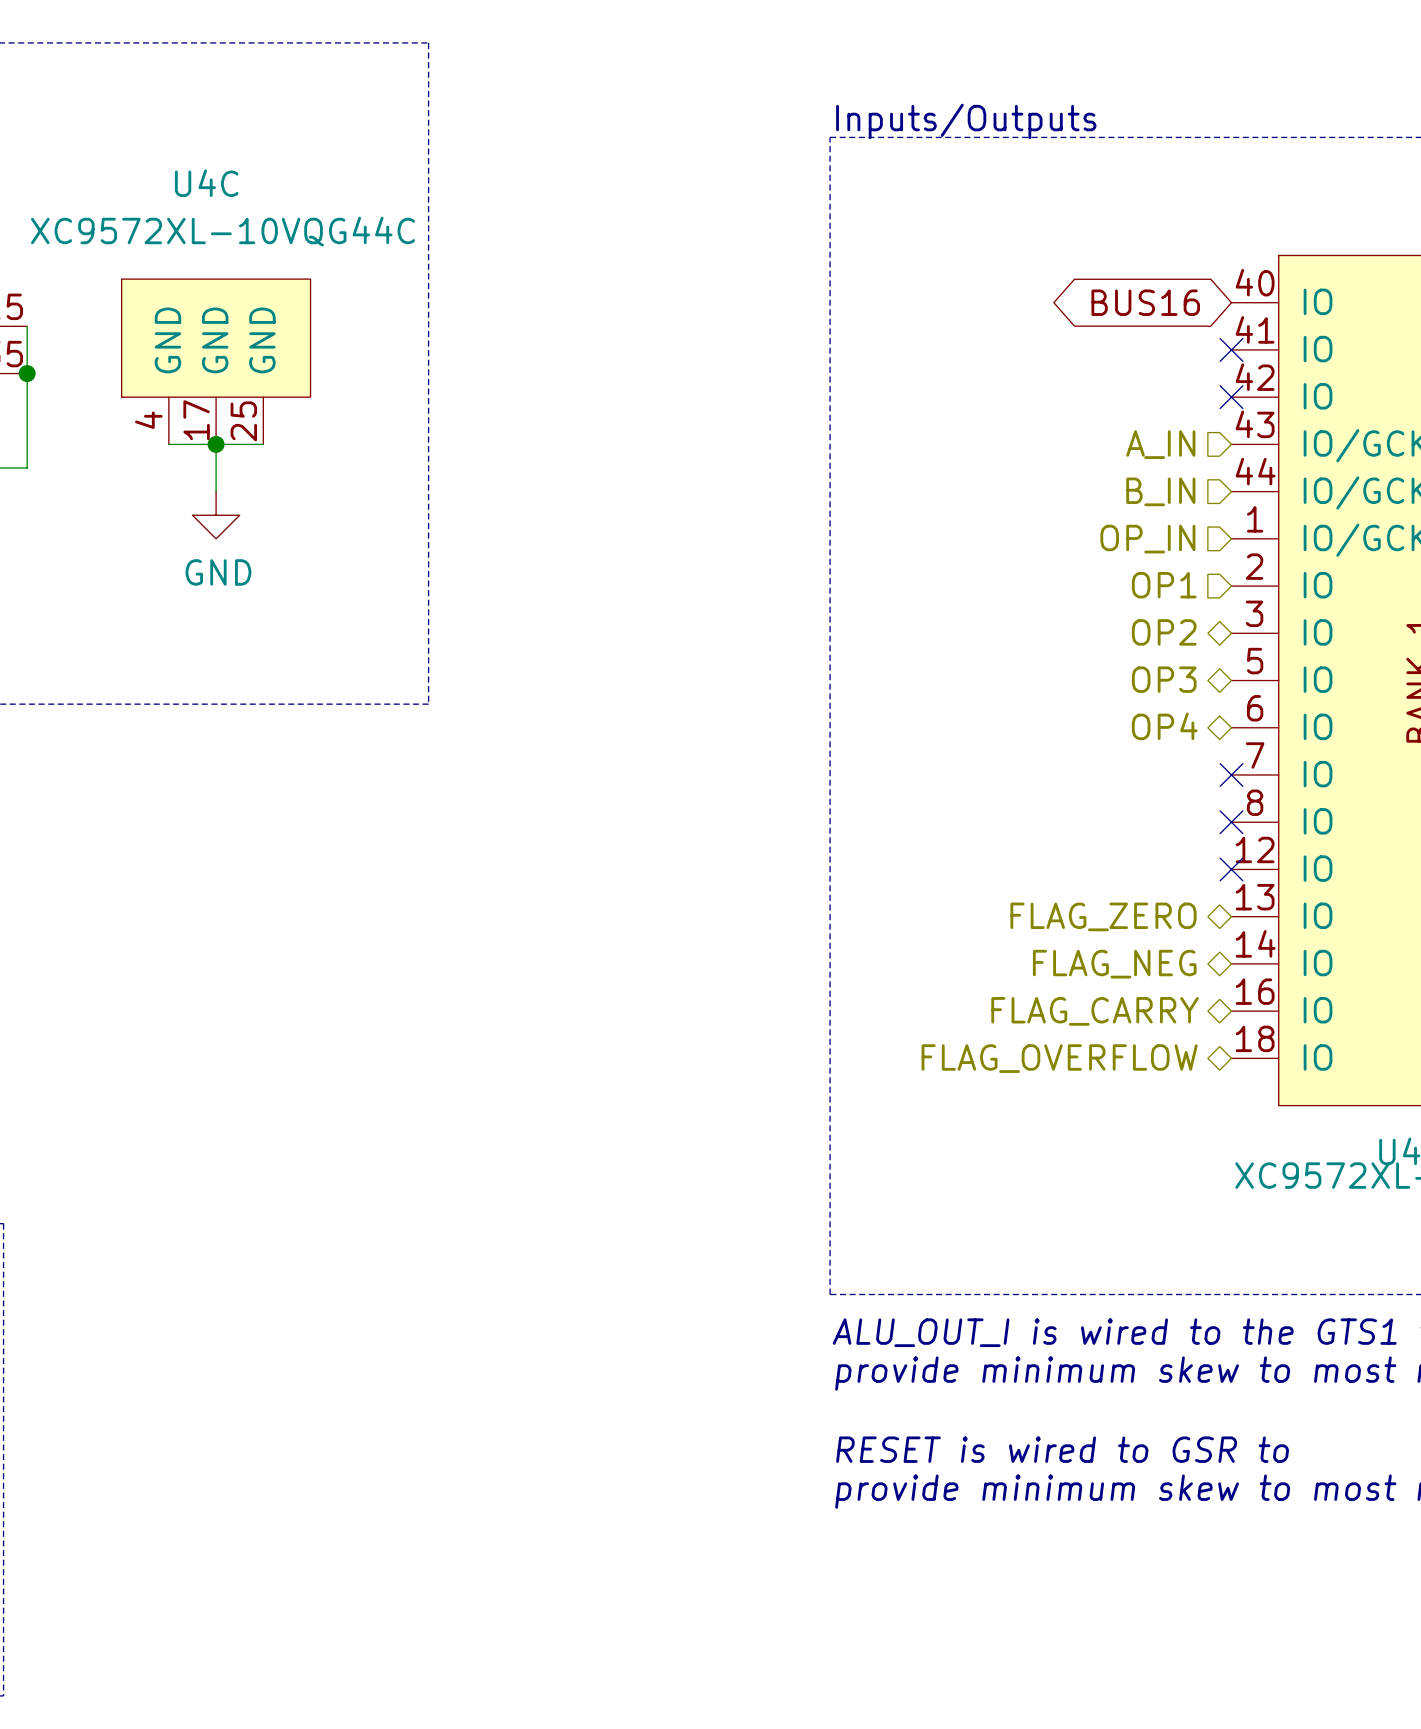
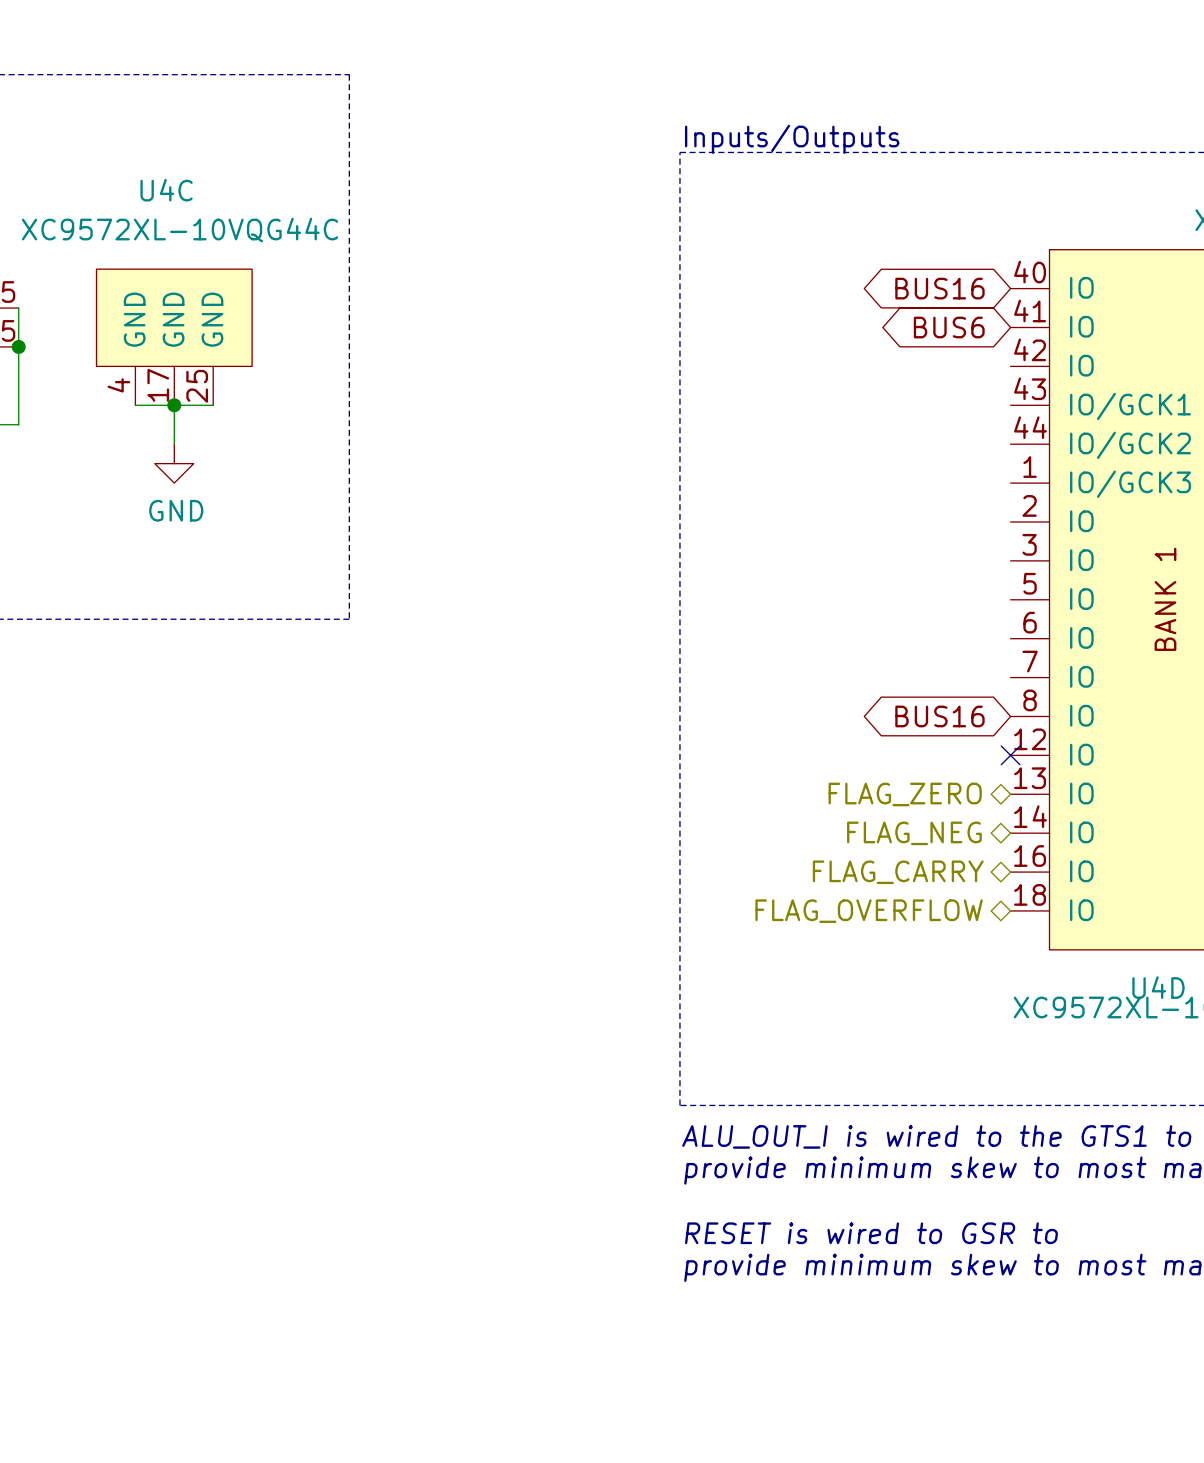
global label: none -> BUS6 (949, 327)
no-connect mark: (1231, 349) -> none
no-connect mark: (1231, 397) -> none
hierarchical label: A_IN (1160, 444) -> none
hierarchical label: B_IN (1160, 491) -> none
hierarchical label: OP_IN (1147, 539) -> none
hierarchical label: OP1 (1164, 585) -> none
hierarchical label: OP2 (1164, 632) -> none
hierarchical label: OP3 (1164, 679) -> none
hierarchical label: OP4 (1164, 726) -> none
no-connect mark: (1231, 774) -> none
global label: none -> BUS16 (939, 716)
no-connect mark: (1231, 822) -> none

